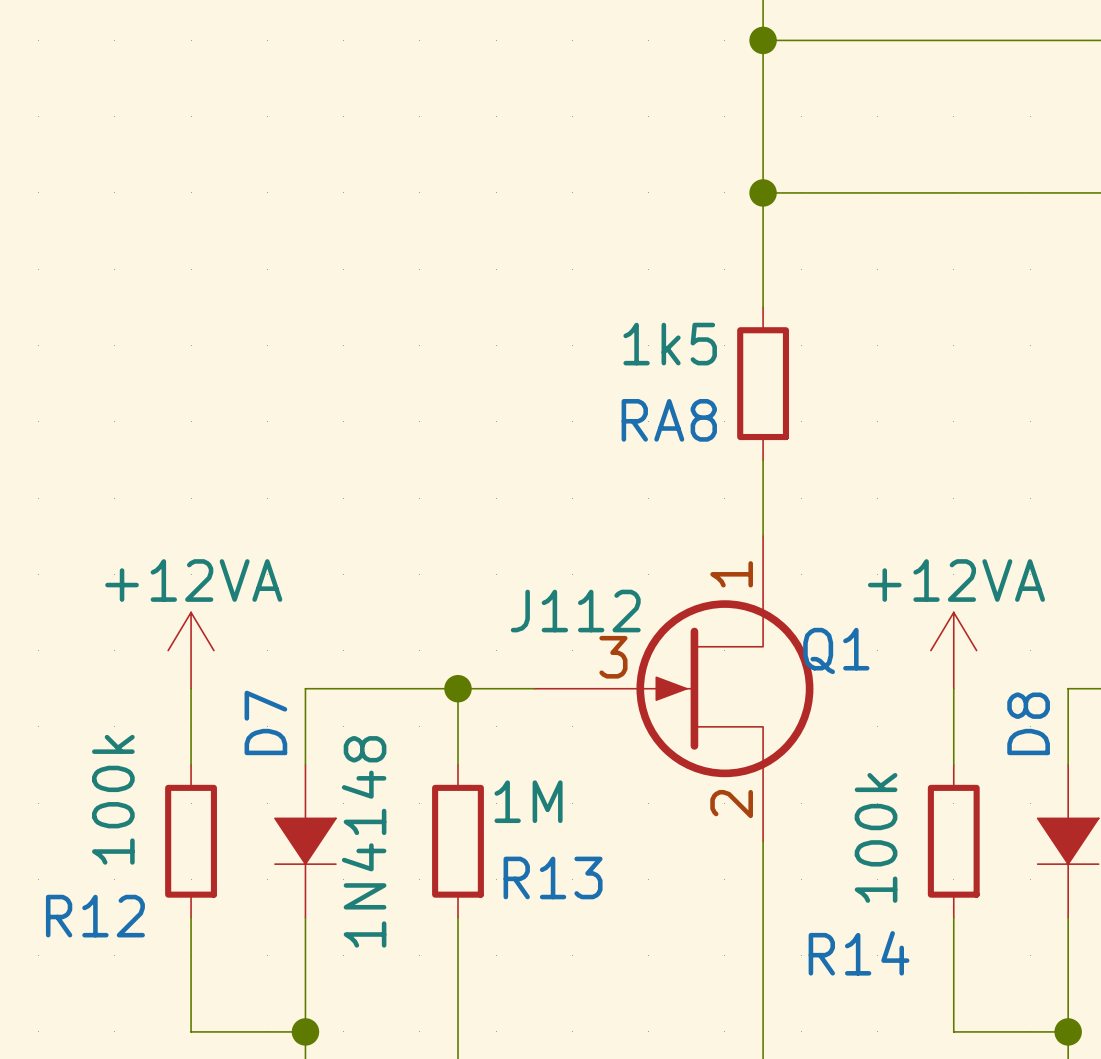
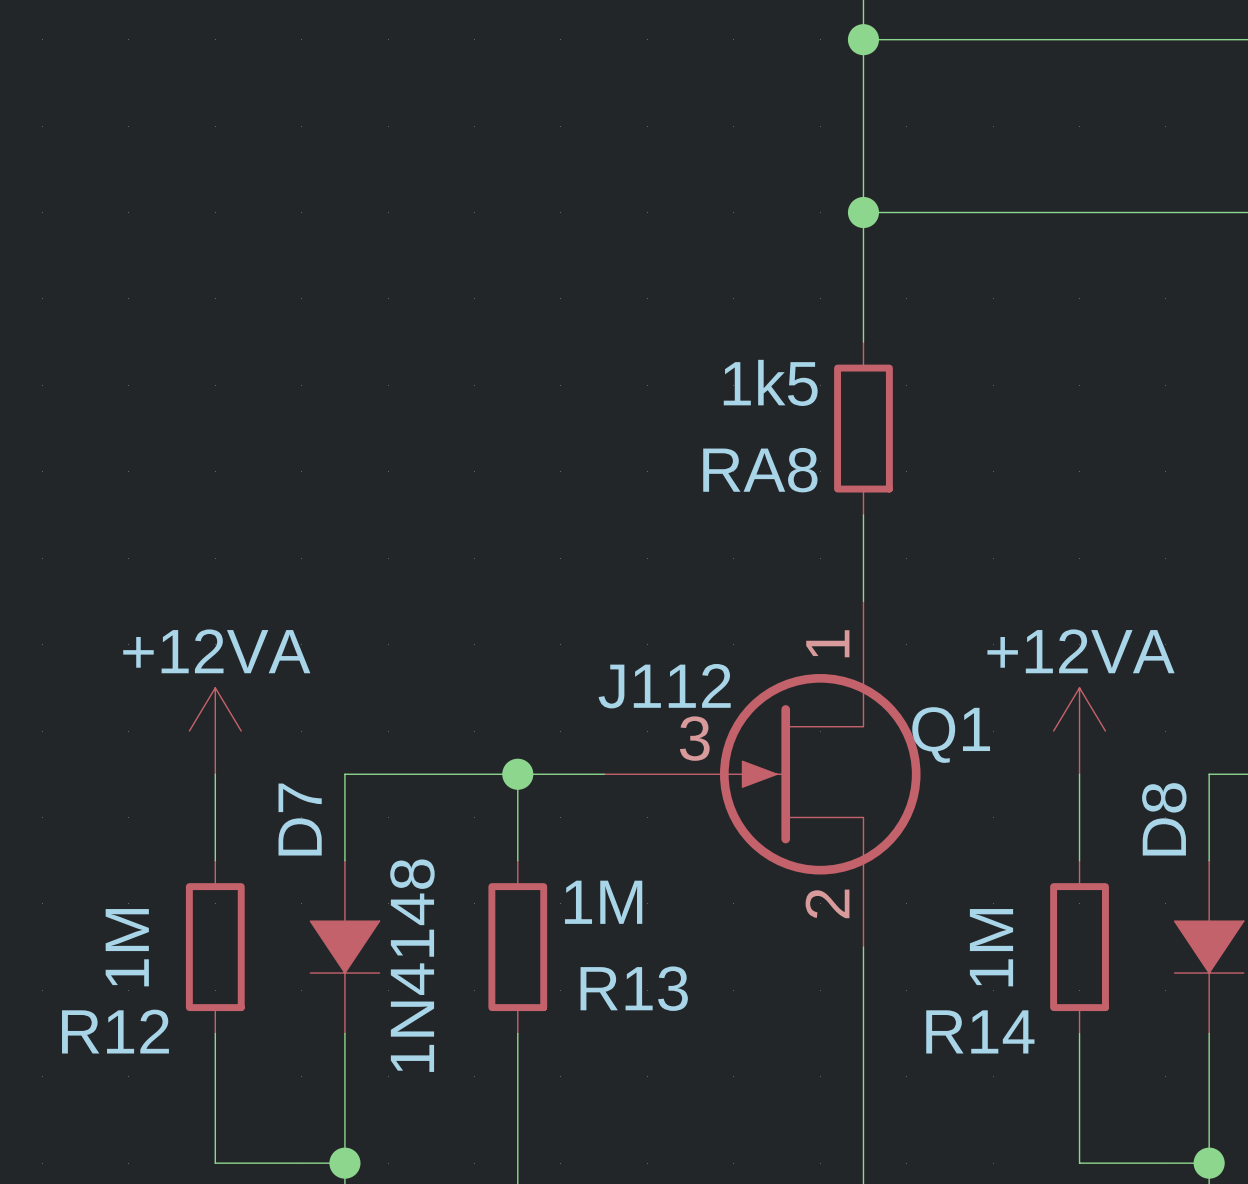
R12 value: 100k (113, 799) -> 1M (127, 947)
R14 value: 100k (876, 837) -> 1M (991, 947)
R14 name position: R14 (859, 953) -> R14 (980, 1031)

